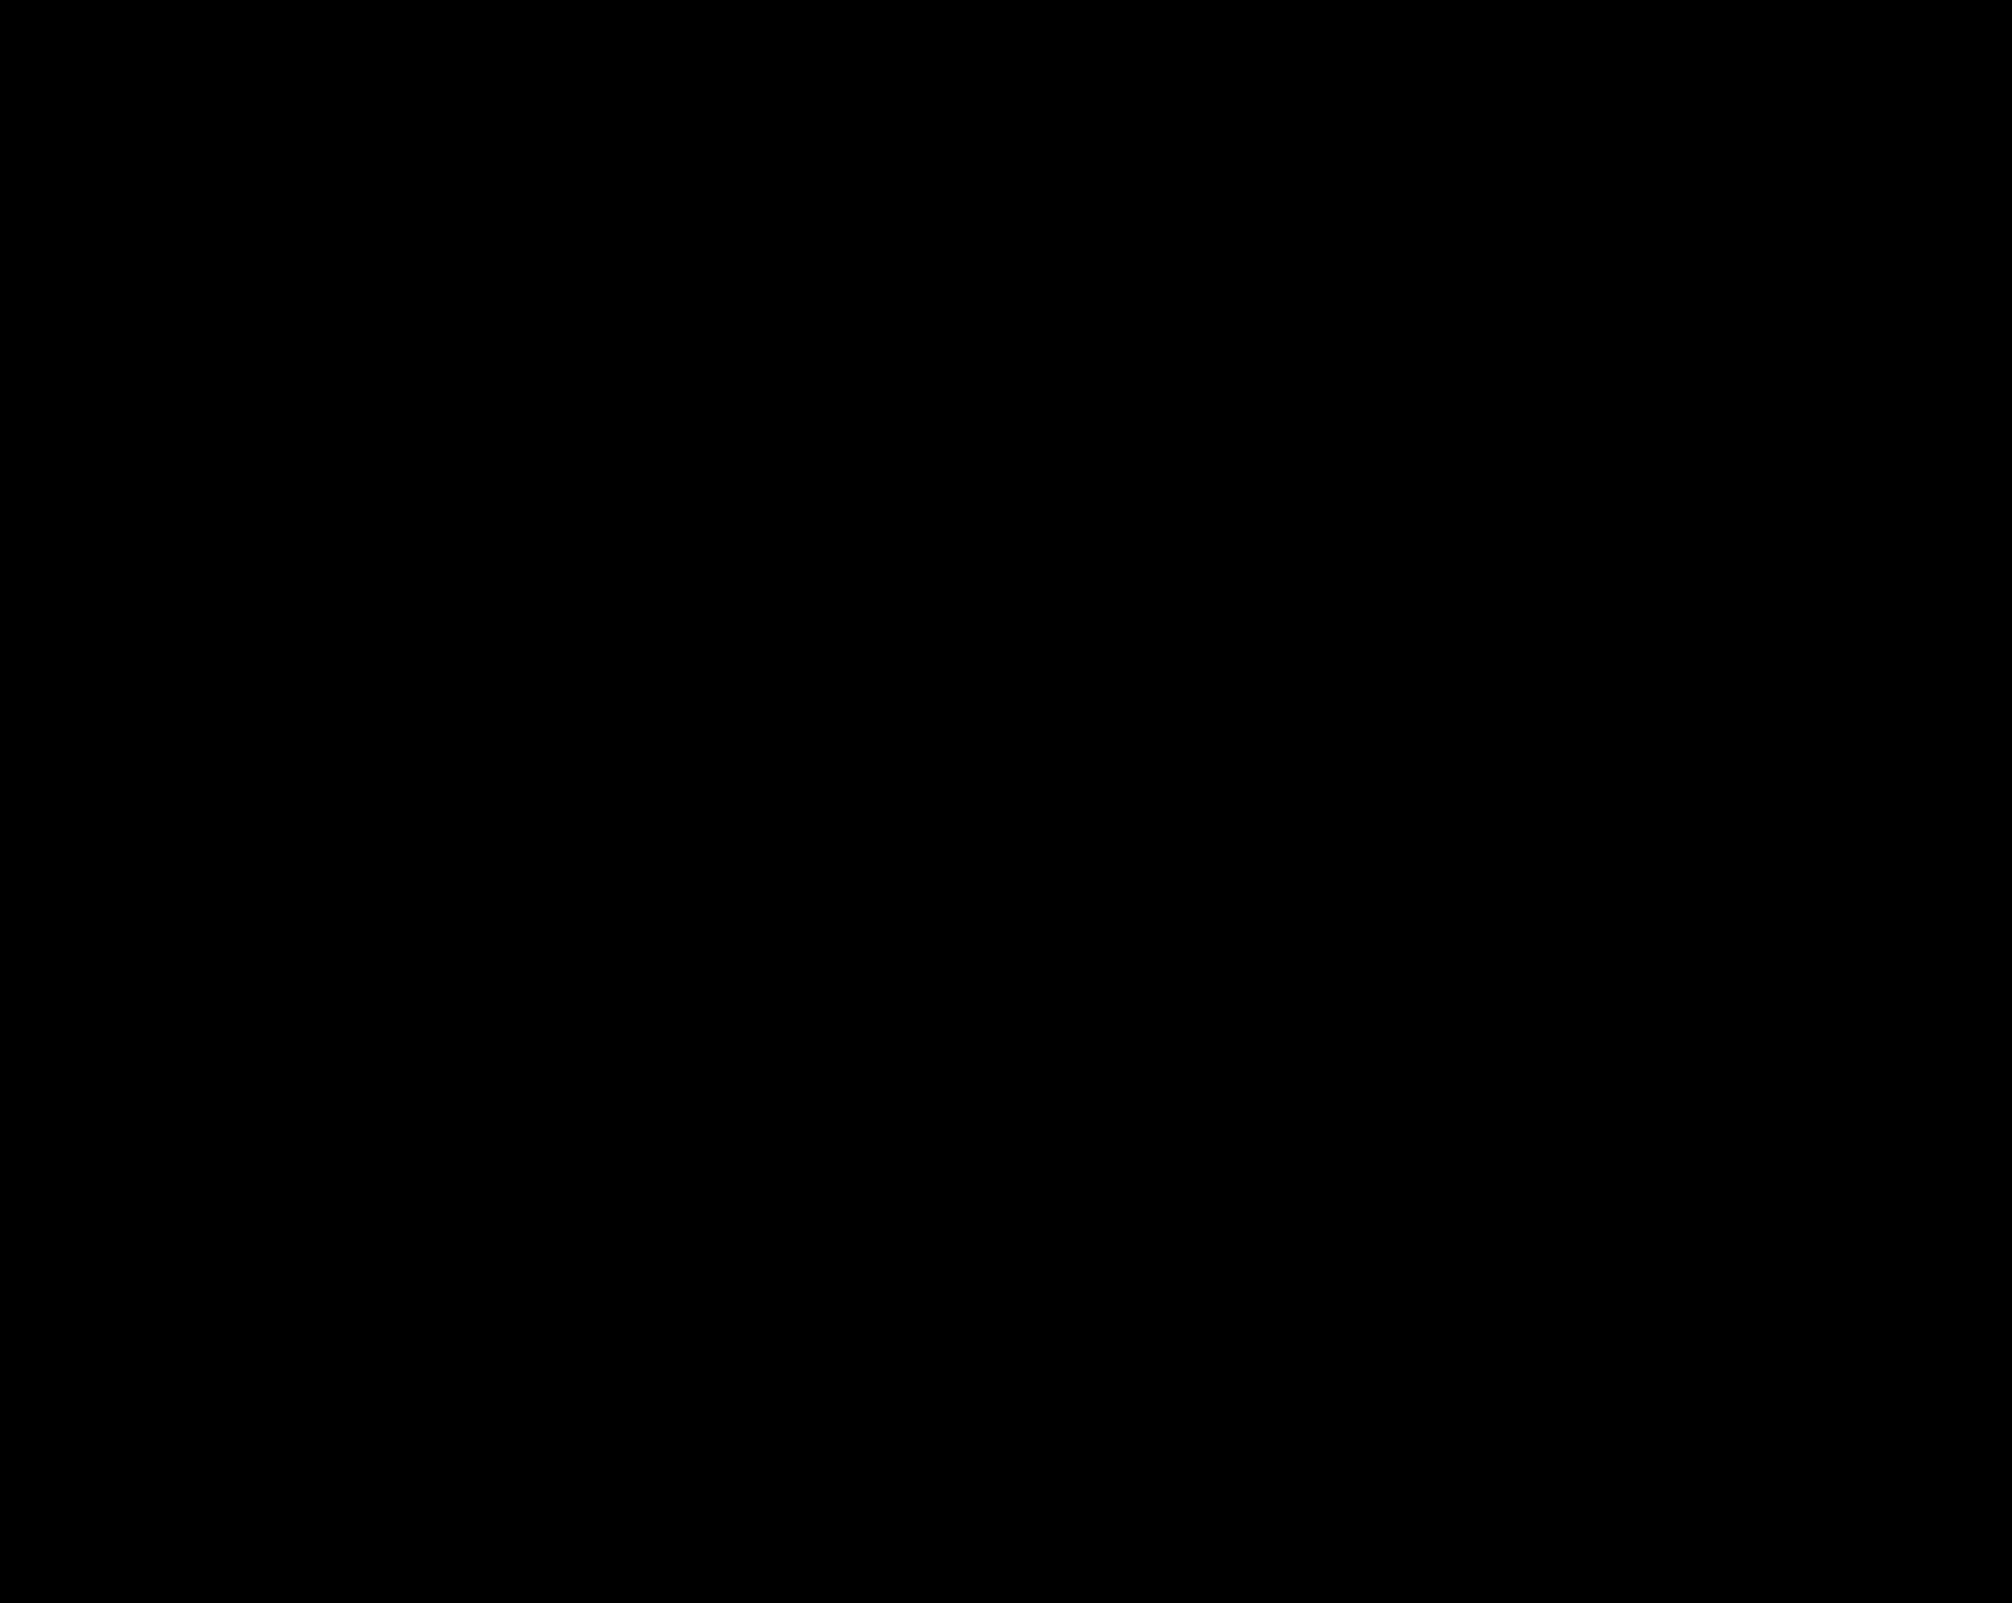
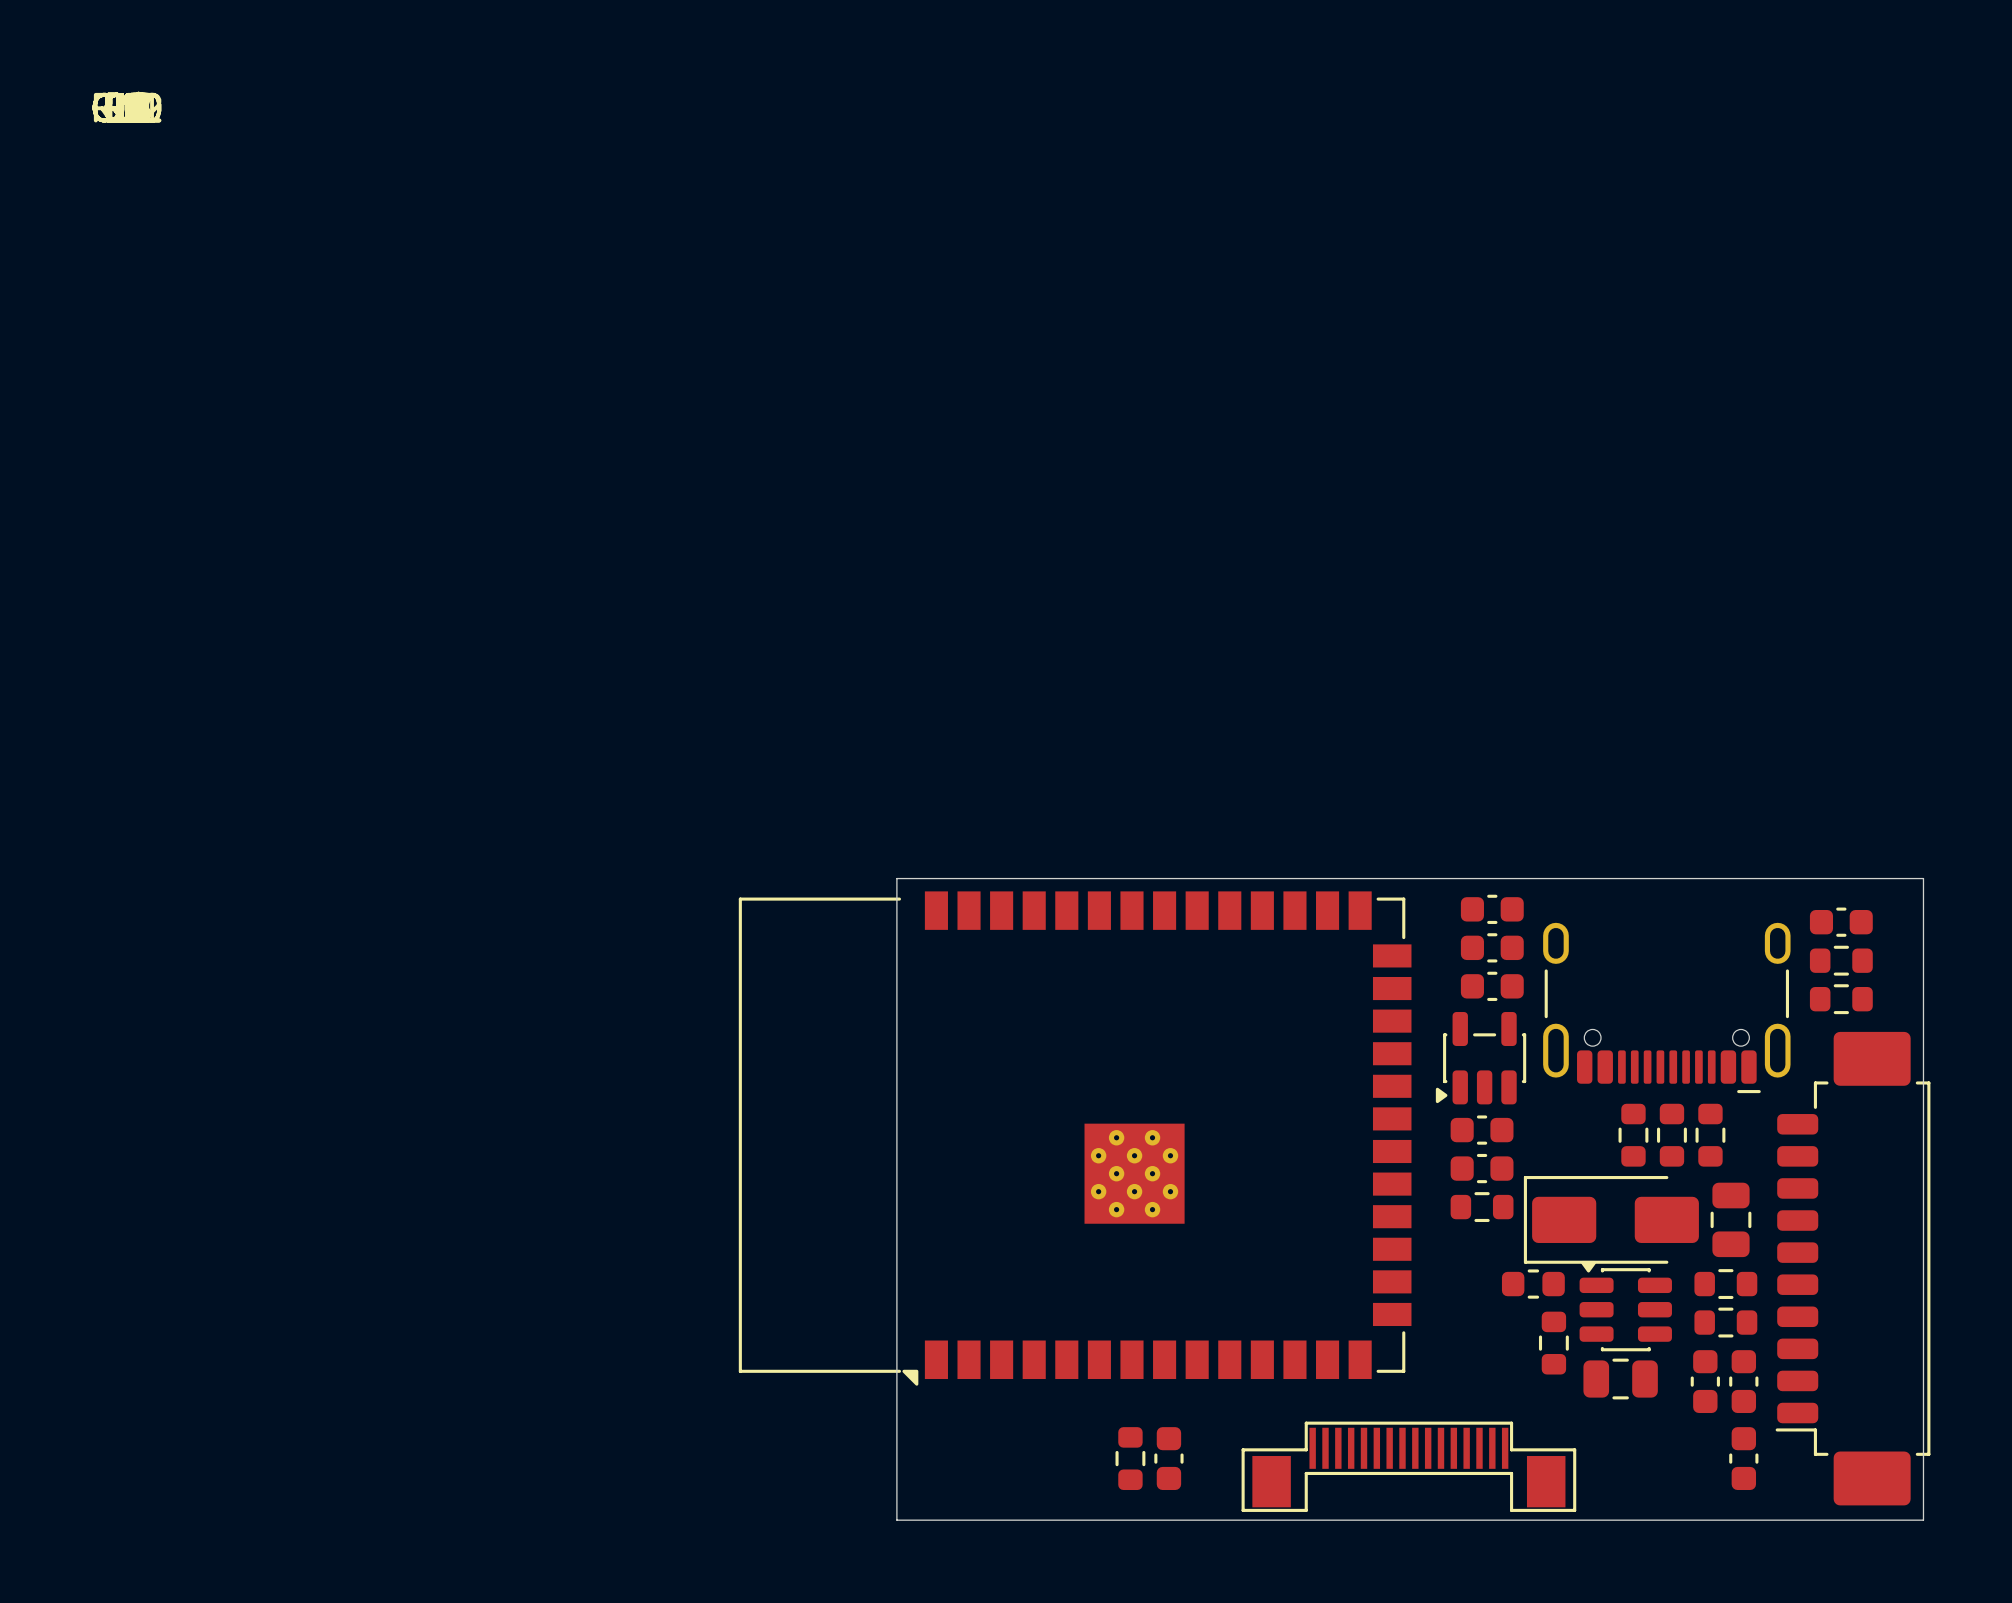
board edge: none -> (896, 878) (1923, 878) (1923, 1520) (896, 1520) (896, 878)
part: none -> (1492, 909)
part: none -> (1841, 922)
part: none -> (1492, 947)
part: none -> (1841, 960)
part: none -> (1492, 986)
part: none -> (1841, 999)
part: none -> (1666, 1007)
part: none -> (1481, 1058)
part: none -> (1482, 1130)
part: none -> (1633, 1135)
part: none -> (1671, 1135)
part: none -> (1710, 1135)
part: none -> (1075, 1138)
part: none -> (1482, 1168)
part: none -> (1482, 1207)
part: none -> (1611, 1219)
part: none -> (1731, 1219)
part: none -> (1853, 1268)
part: none -> (1533, 1284)
part: none -> (1725, 1284)
part: none -> (1625, 1306)
part: none -> (1725, 1322)
part: none -> (1553, 1343)
part: none -> (1620, 1379)
part: none -> (1705, 1381)
part: none -> (1743, 1381)
part: none -> (1130, 1458)
part: none -> (1168, 1458)
part: none -> (1743, 1458)
part: none -> (1408, 1466)

